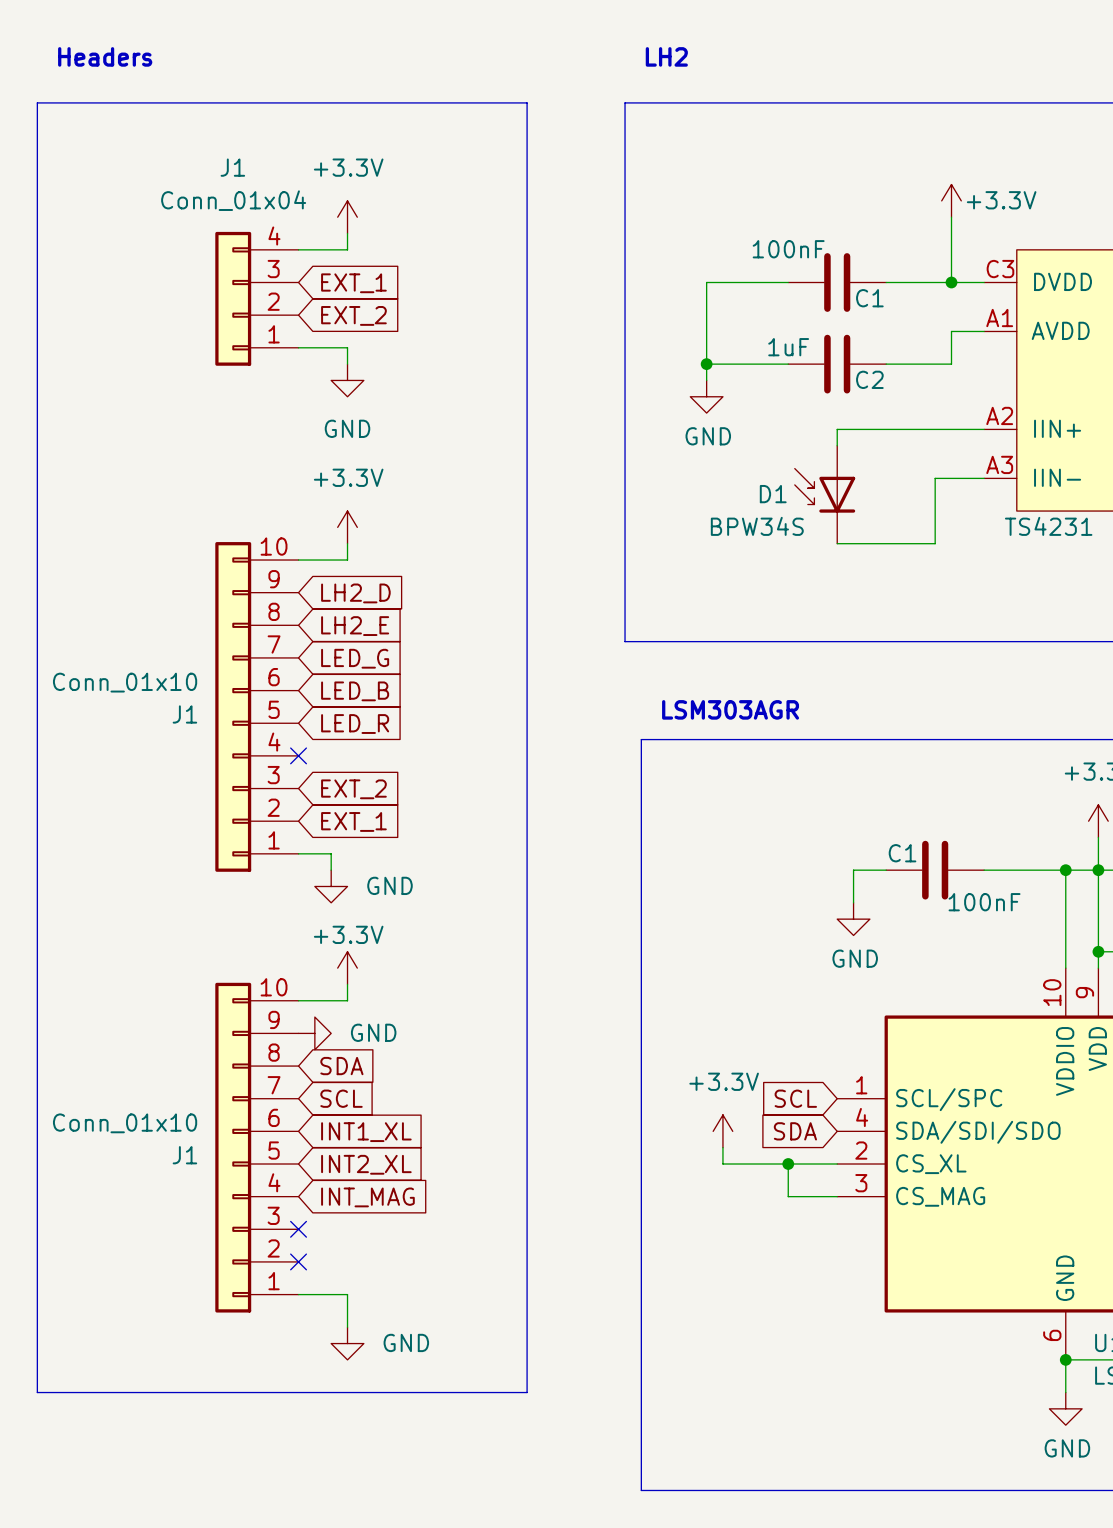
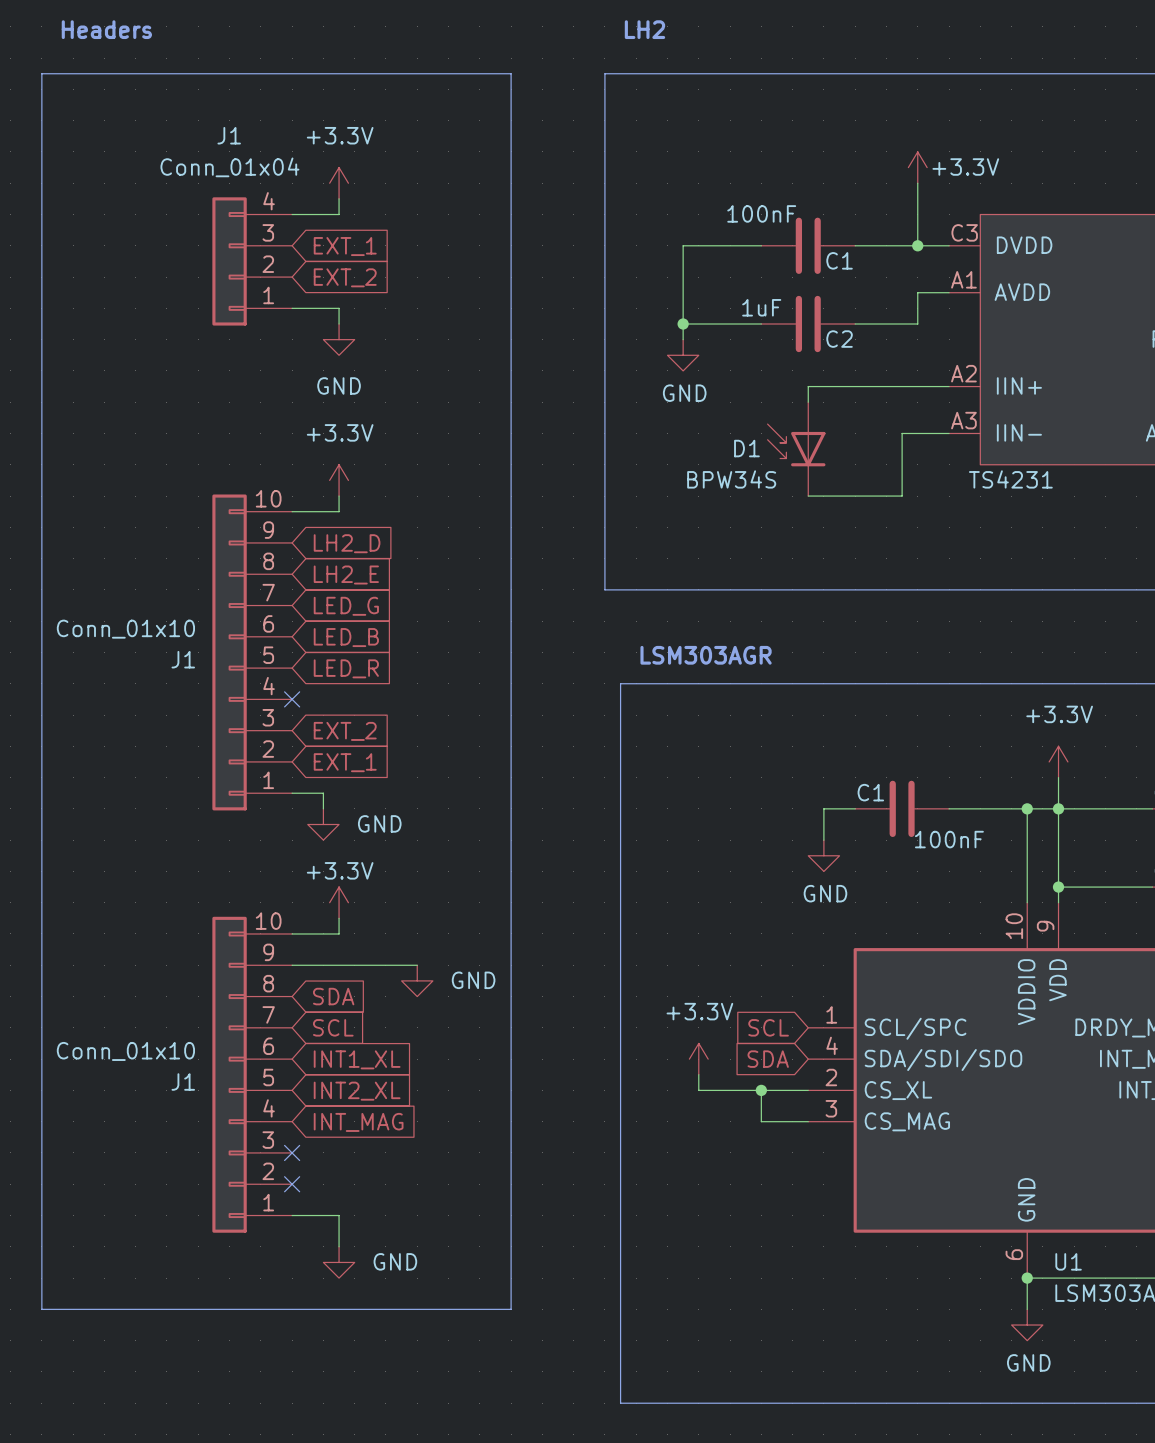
wire: none -> (292, 965) (417, 965)
power symbol rotation: 0° (314, 1033) -> 90° clockwise (417, 980)
power symbol position: GND (314, 1033) -> GND (417, 980)

